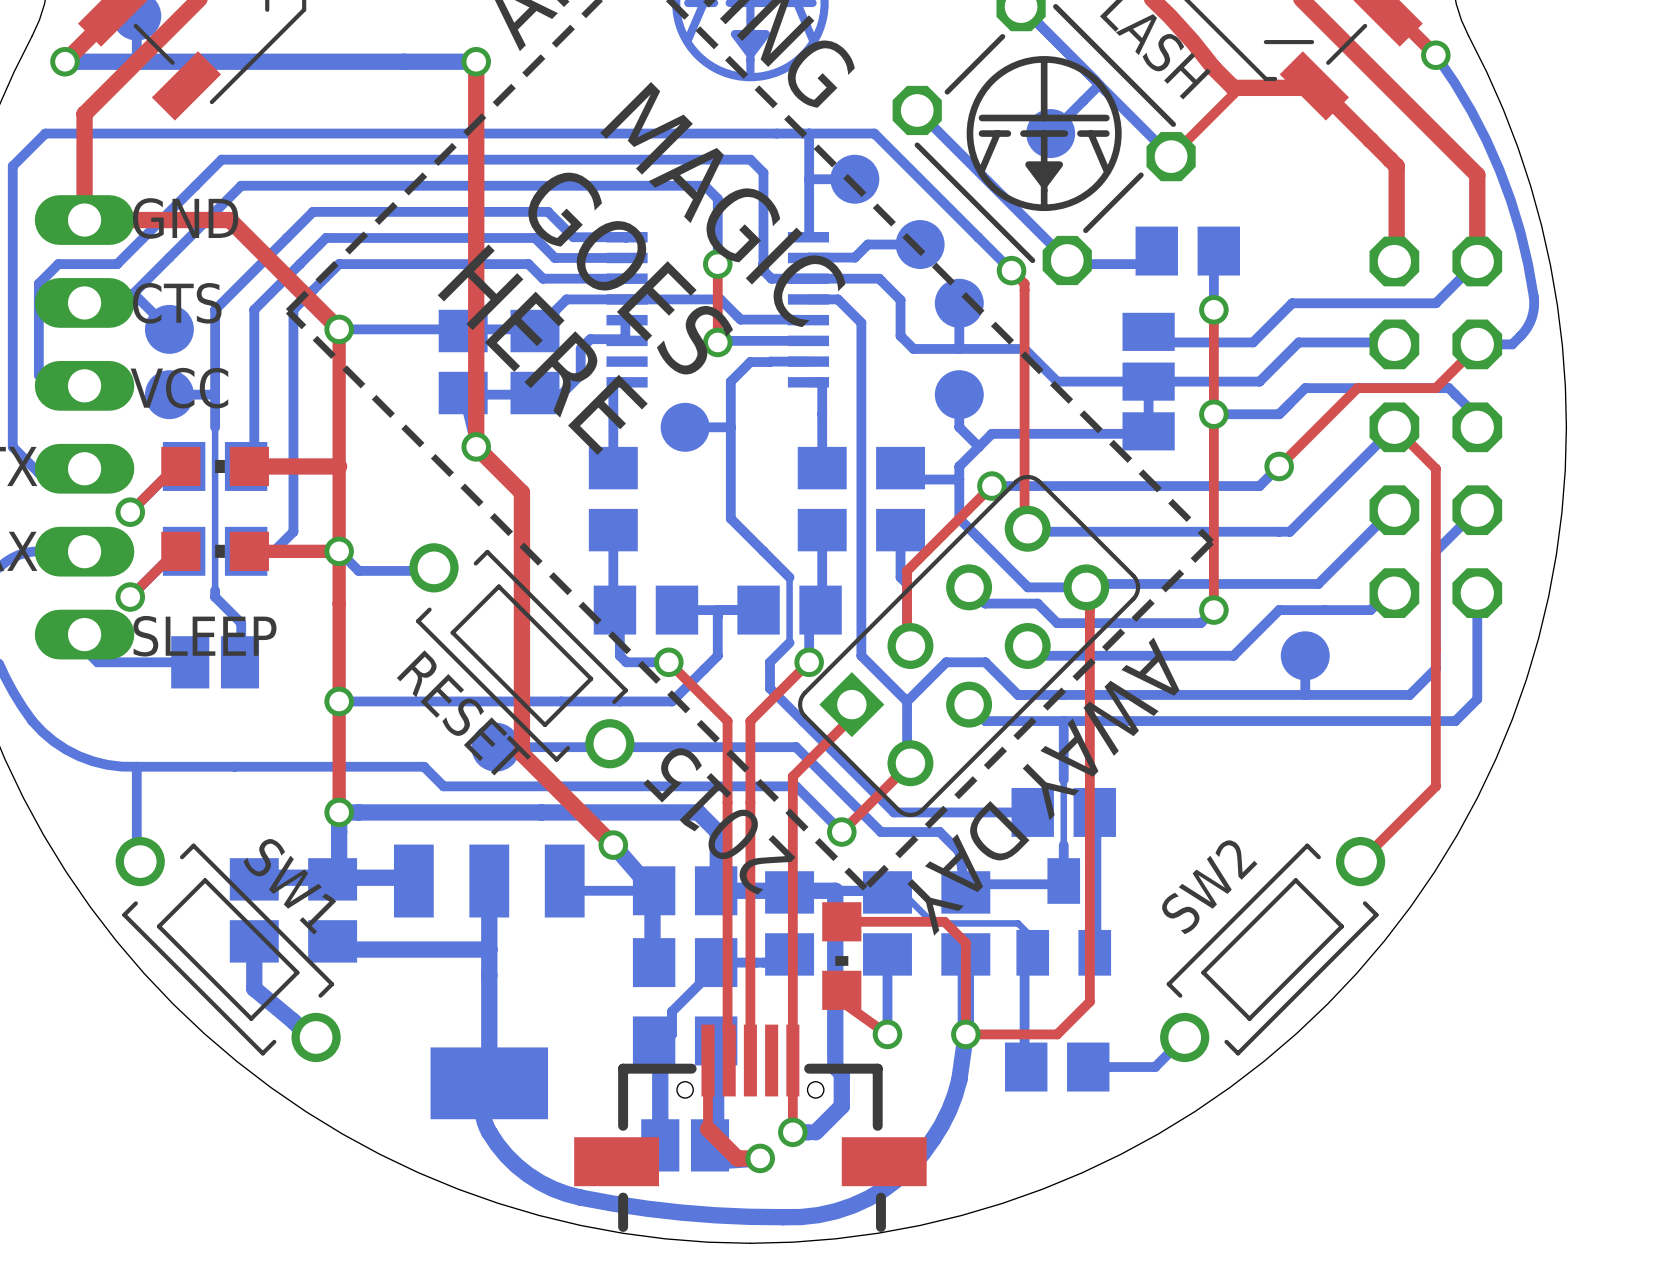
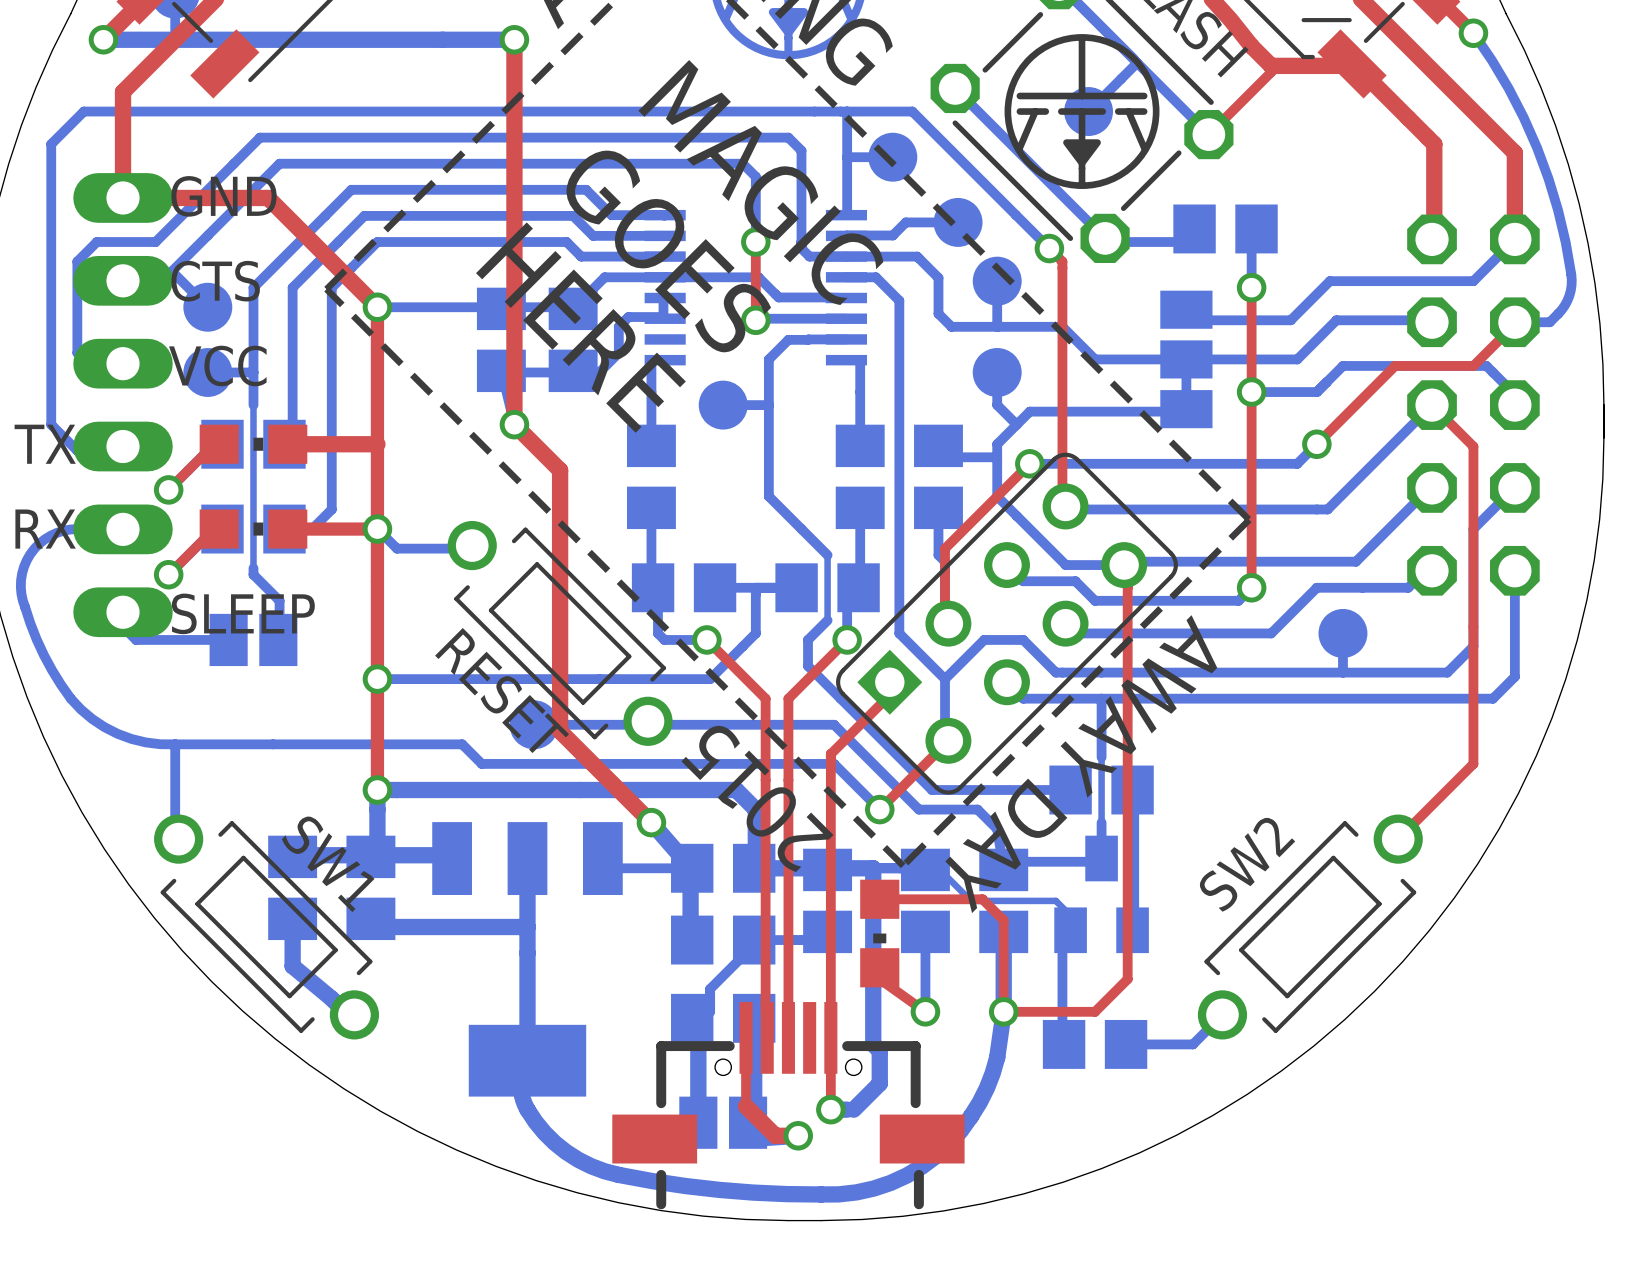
board edge: (1566, 427) (1561, 512) (1548, 596) (1526, 679) (1512, 719) (1477, 797) (1434, 871) (1384, 940) (1327, 1004) (1263, 1061) (1194, 1111) (1120, 1154) (1042, 1189) (1002, 1203) (920, 1225) (835, 1238) (750, 1243) -> (1603, 405) (1602, 478) (1594, 560) (1577, 640) (1551, 718) (1518, 793) (1477, 864) (1429, 930) (1374, 991) (1313, 1046) (1247, 1094) (1176, 1135) (1101, 1168) (1023, 1193) (943, 1210) (862, 1219) (788, 1220)

